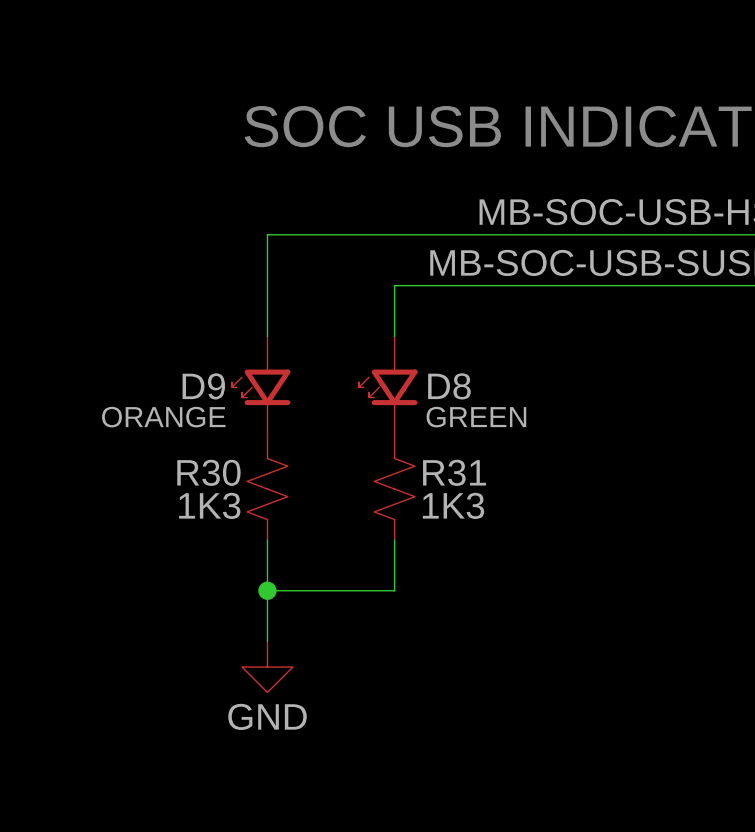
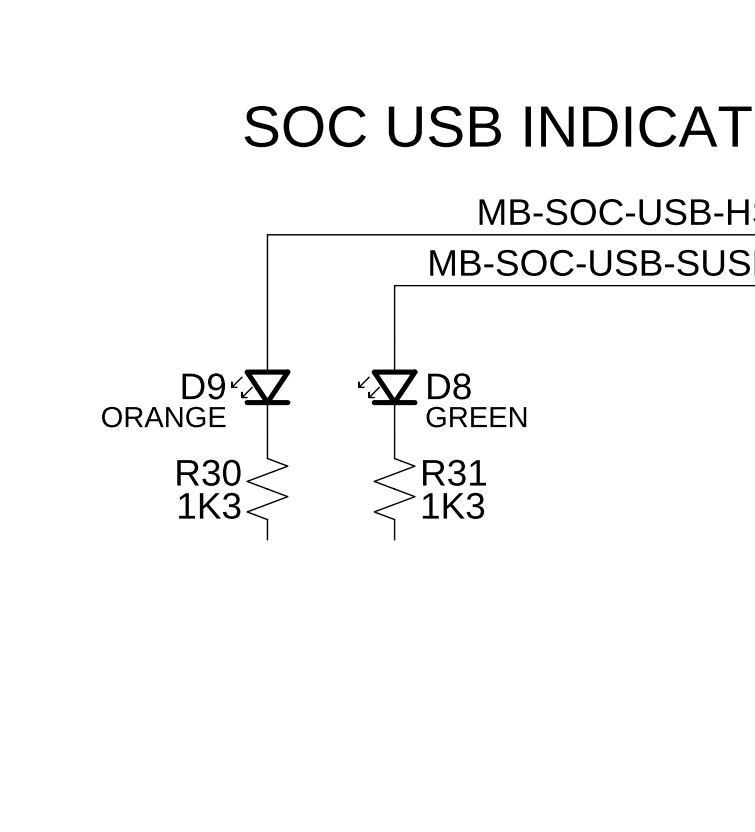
wire: (267, 539) (267, 641) -> none
wire: (394, 539) (394, 590) (267, 590) -> none
junction: (267, 590) -> none
power symbol: GND (267, 667) -> none

